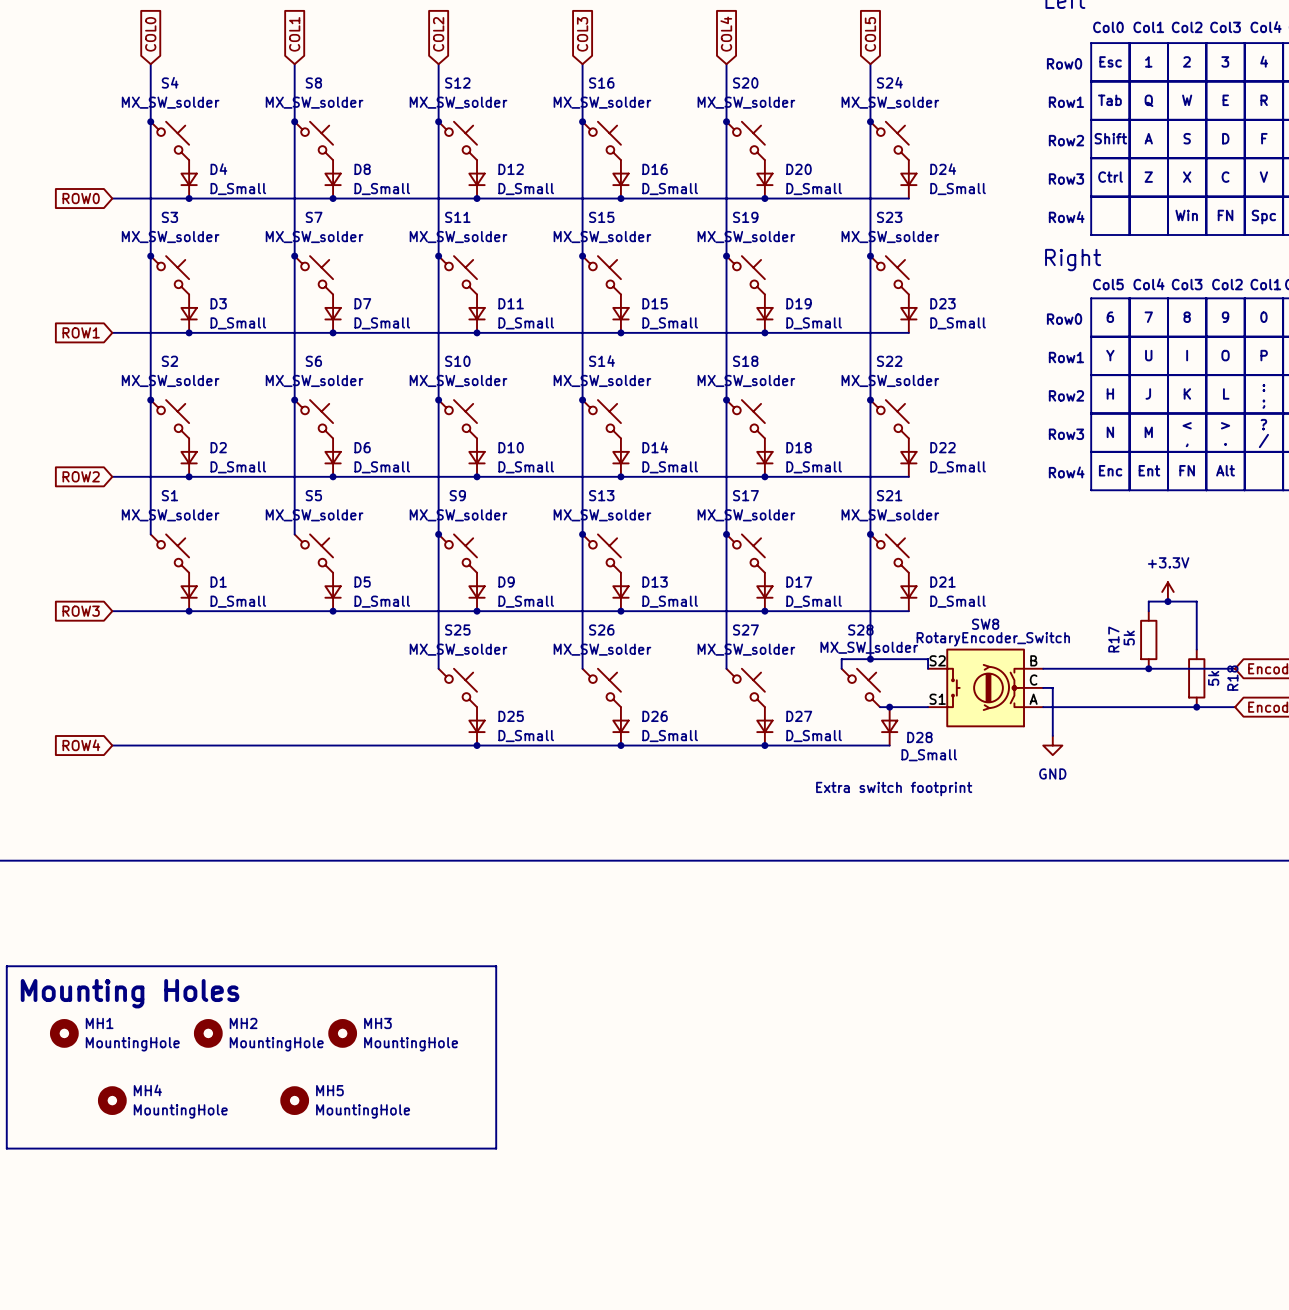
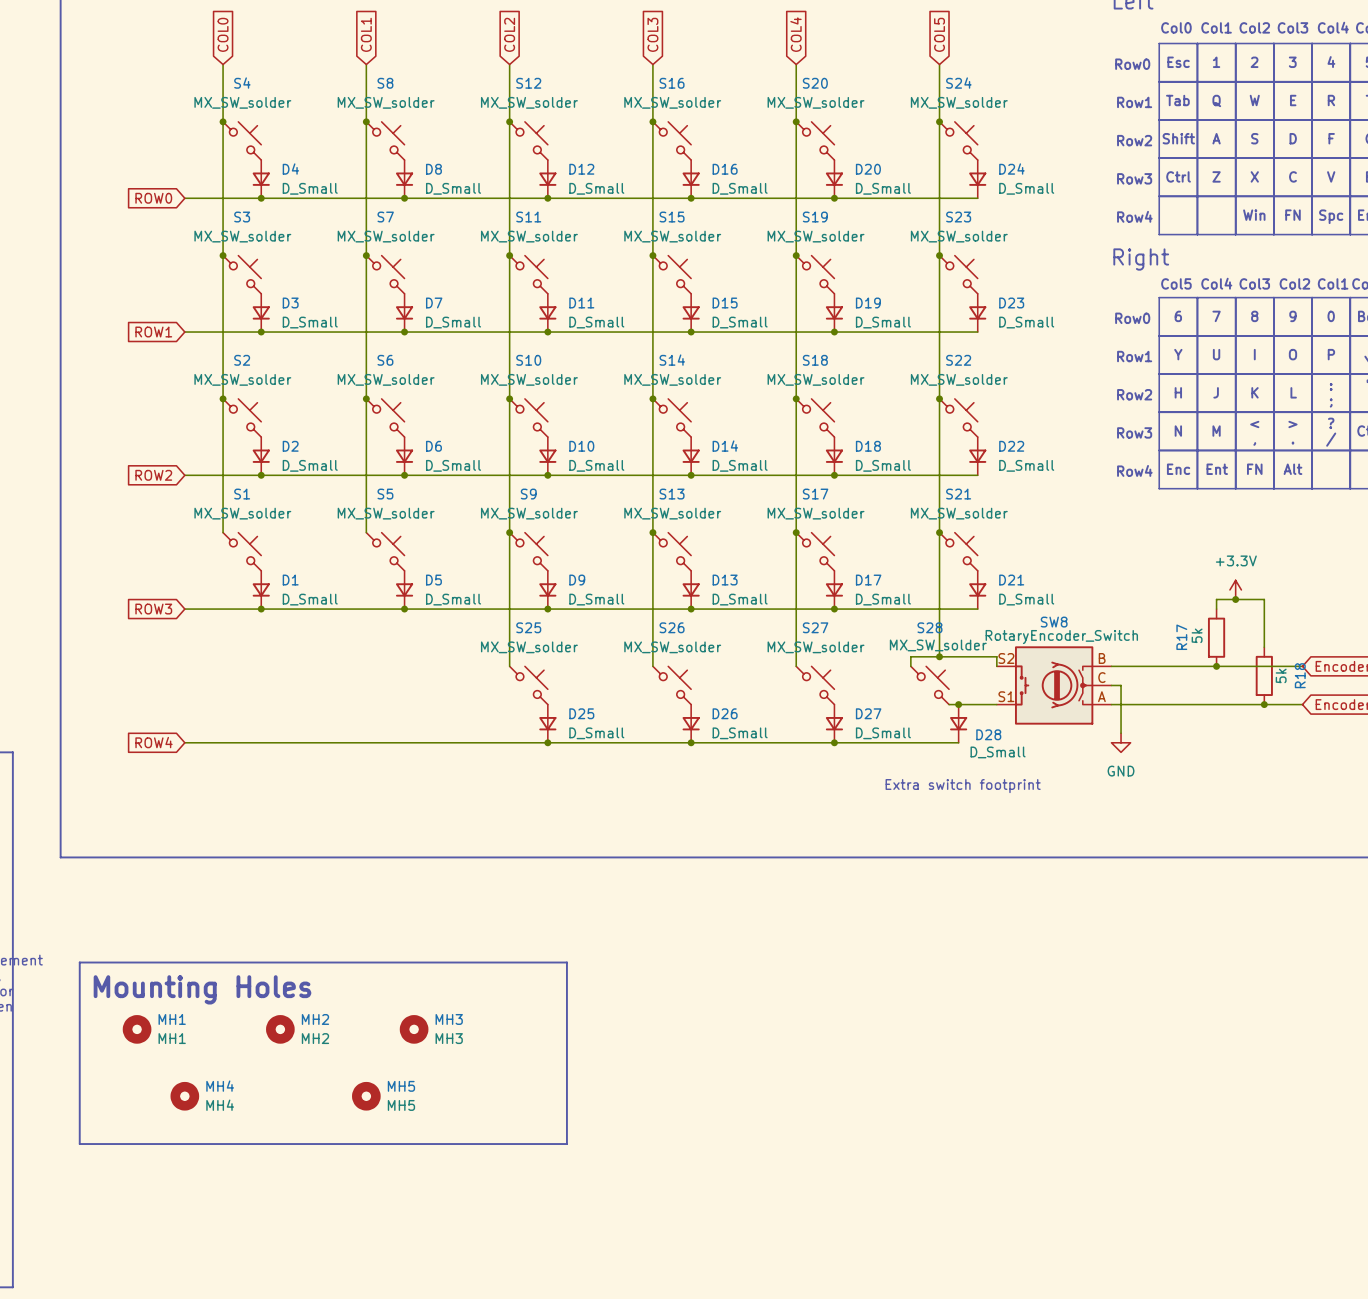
MH1 value: MountingHole (132, 1044) -> MH1 (172, 1038)
MH2 value: MountingHole (276, 1044) -> MH2 (315, 1038)
MH3 value: MountingHole (411, 1044) -> MH3 (449, 1038)
MH4 value: MountingHole (180, 1111) -> MH4 (220, 1105)
MH5 value: MountingHole (363, 1111) -> MH5 (401, 1105)

